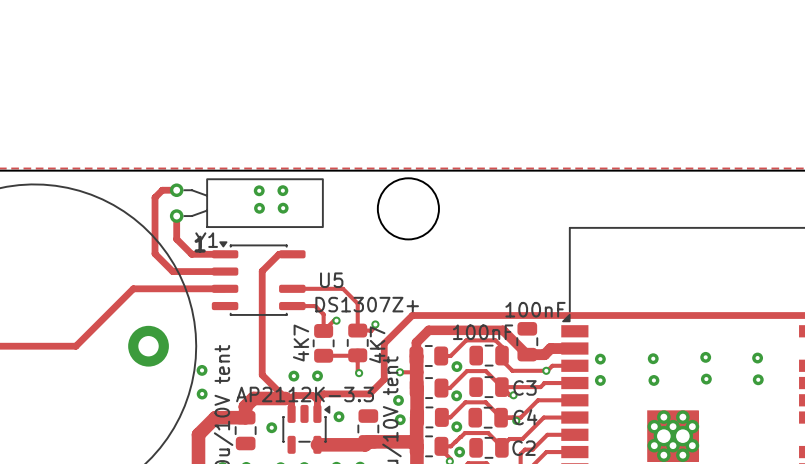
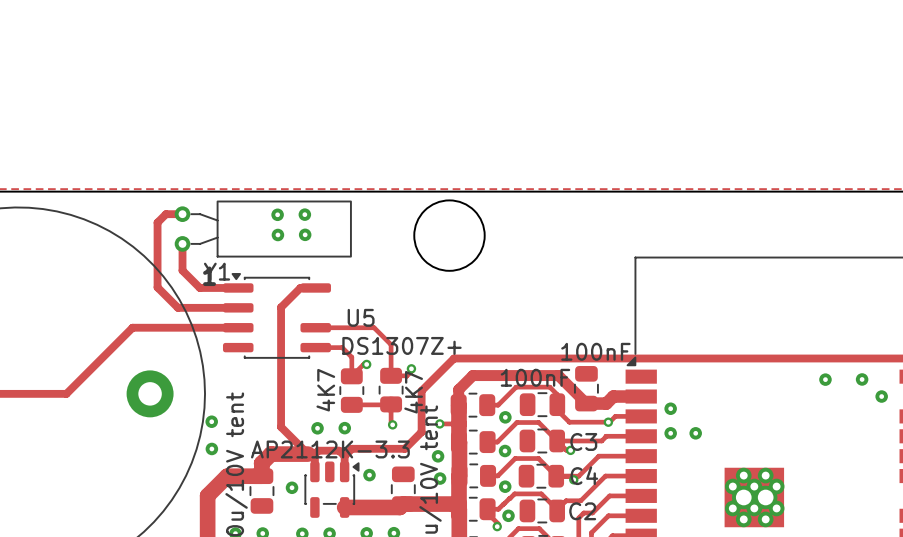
via: none -> (825, 379)
via: none -> (862, 379)
via: none -> (881, 396)
via: (705, 357) -> none
via: (653, 358) -> none
via: (757, 358) -> none
via: (706, 379) -> none
via: (758, 379) -> none
via: none -> (695, 433)
via: (653, 380) -> none

